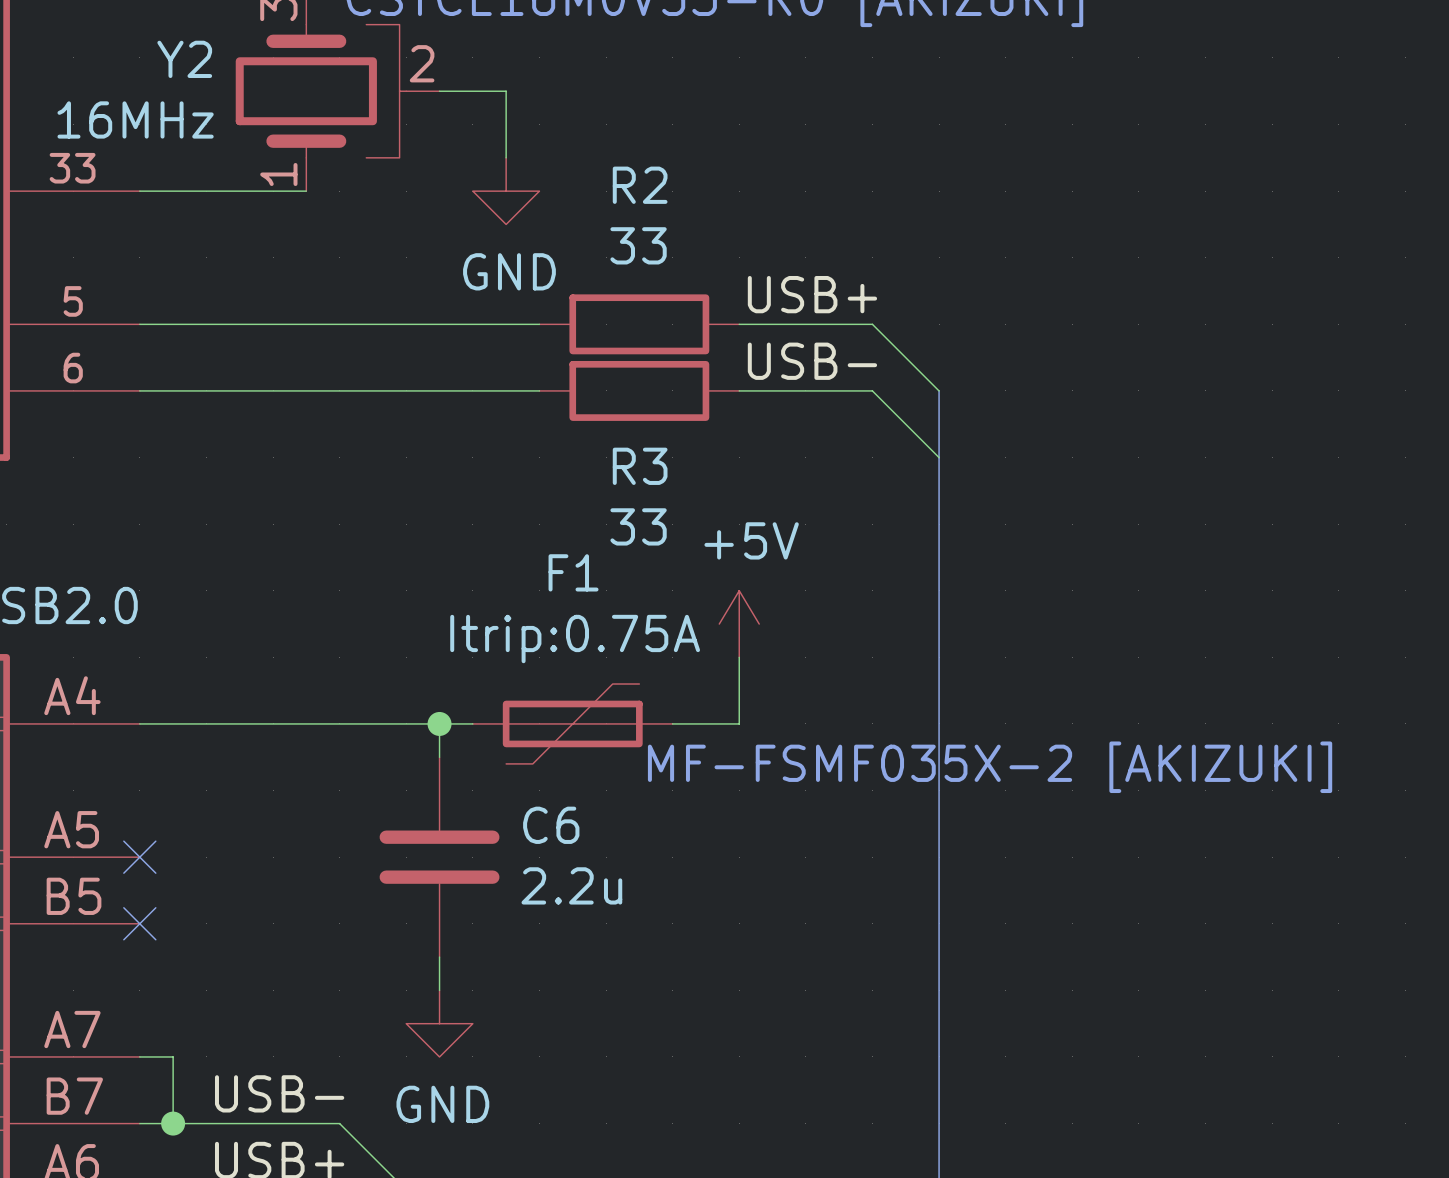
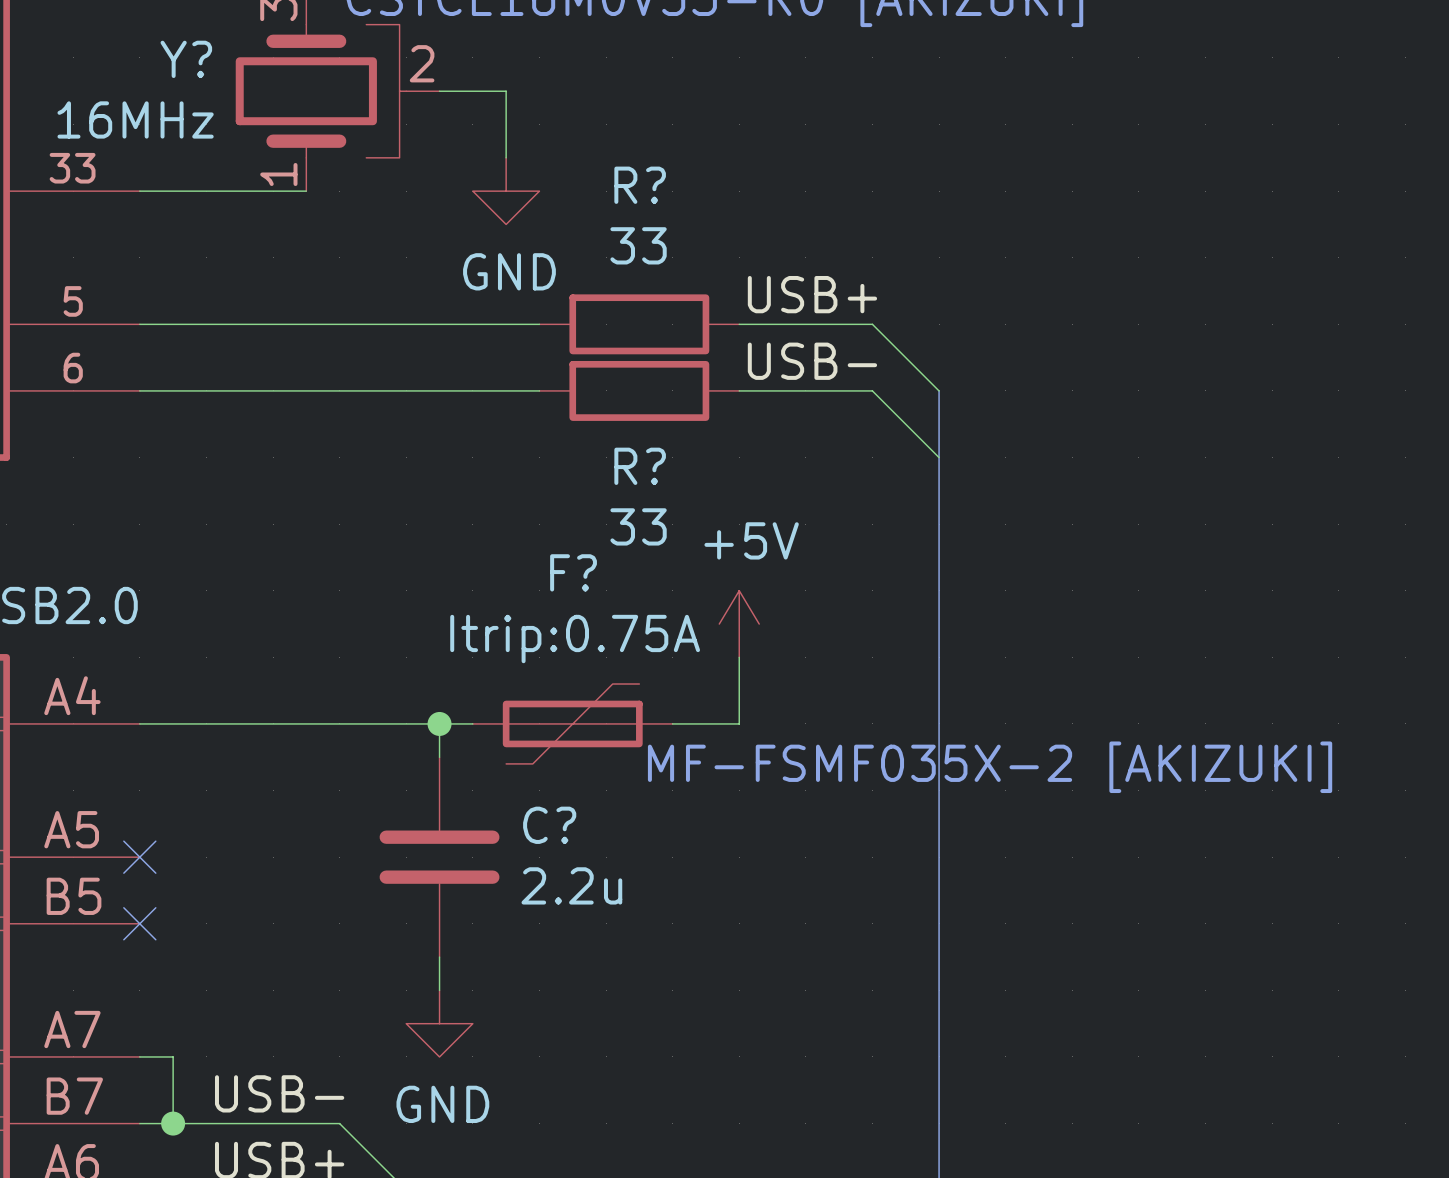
Y2 name: Y2 (184, 59) -> Y? (186, 59)
R2 name: R2 (640, 185) -> R? (640, 185)
R3 name: R3 (640, 466) -> R? (640, 466)
F1 name: F1 (573, 572) -> F? (573, 572)
C6 name: C6 (551, 825) -> C? (549, 825)

